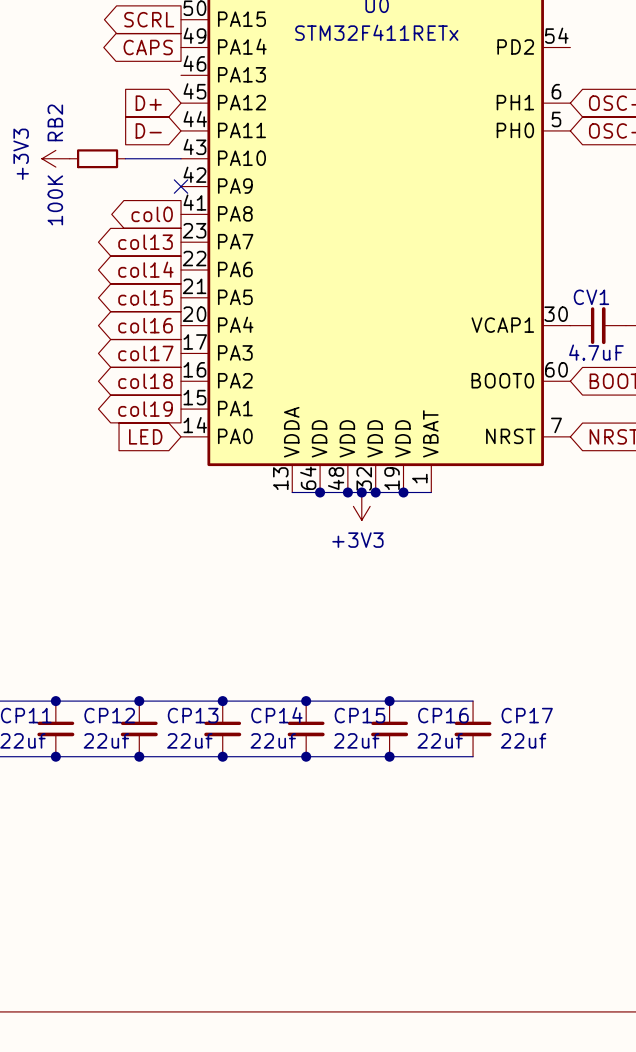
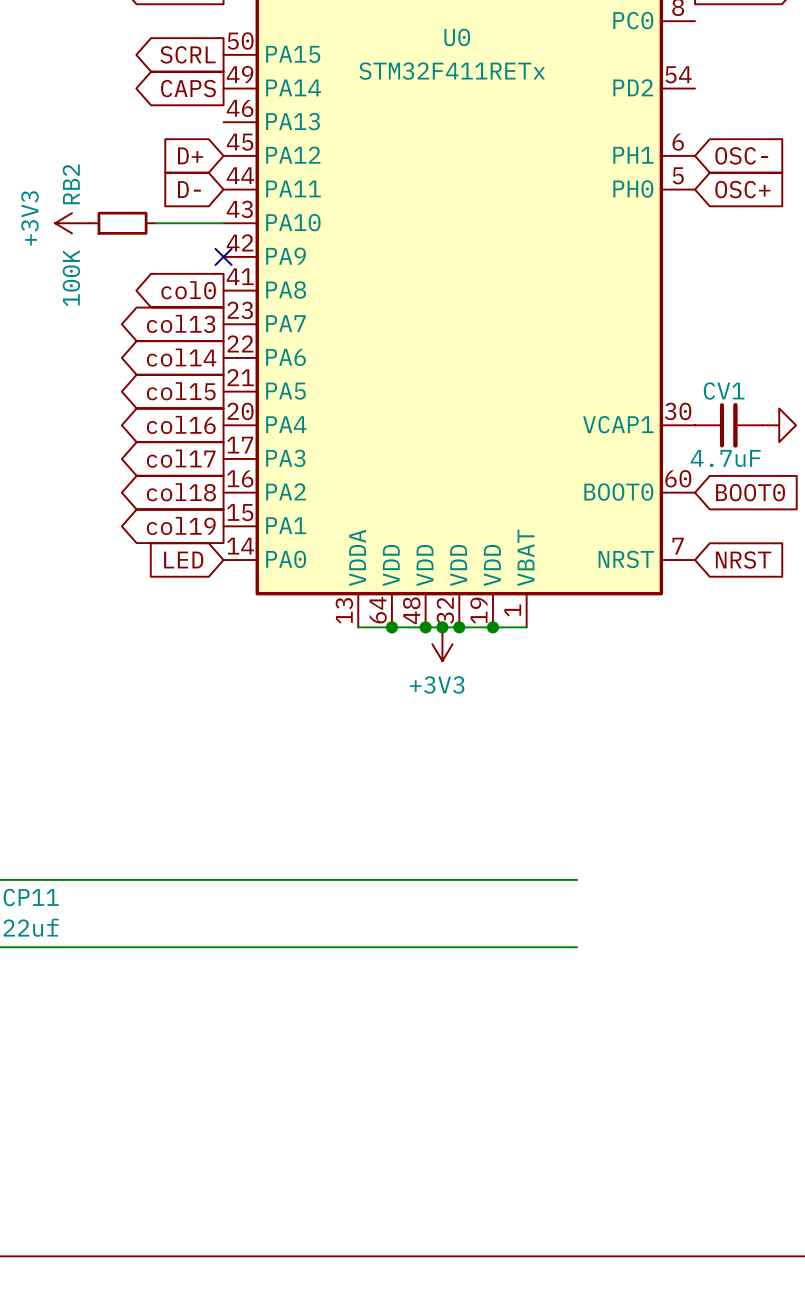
junction: (55, 701) -> none
junction: (139, 701) -> none
junction: (222, 701) -> none
junction: (306, 701) -> none
junction: (389, 701) -> none
CP12: 22uf (55, 728) -> none
CP13: 22uf (139, 728) -> none
CP14: 22uf (222, 728) -> none
CP15: 22uf (306, 728) -> none
CP16: 22uf (389, 728) -> none
CP17: 22uf (473, 728) -> none
junction: (55, 756) -> none
junction: (139, 756) -> none
junction: (222, 756) -> none
junction: (306, 756) -> none
junction: (389, 756) -> none

